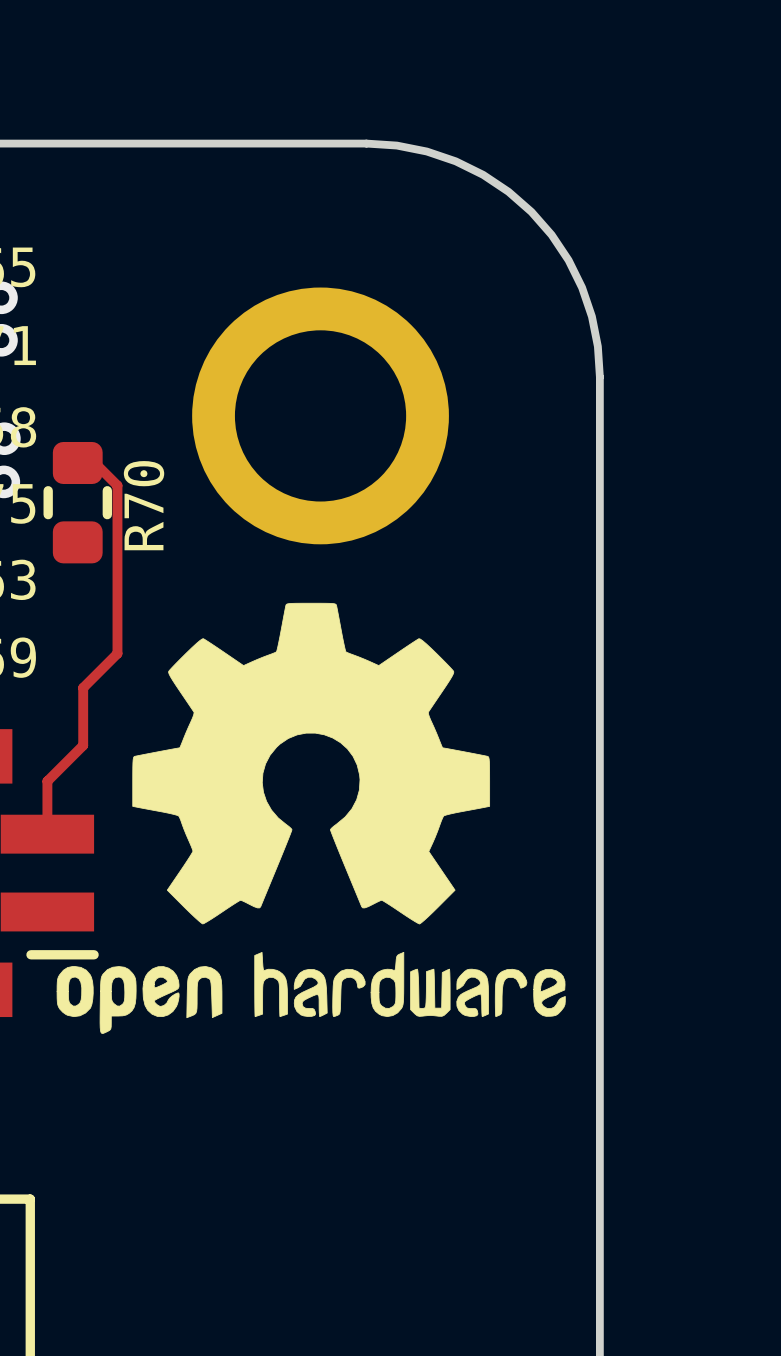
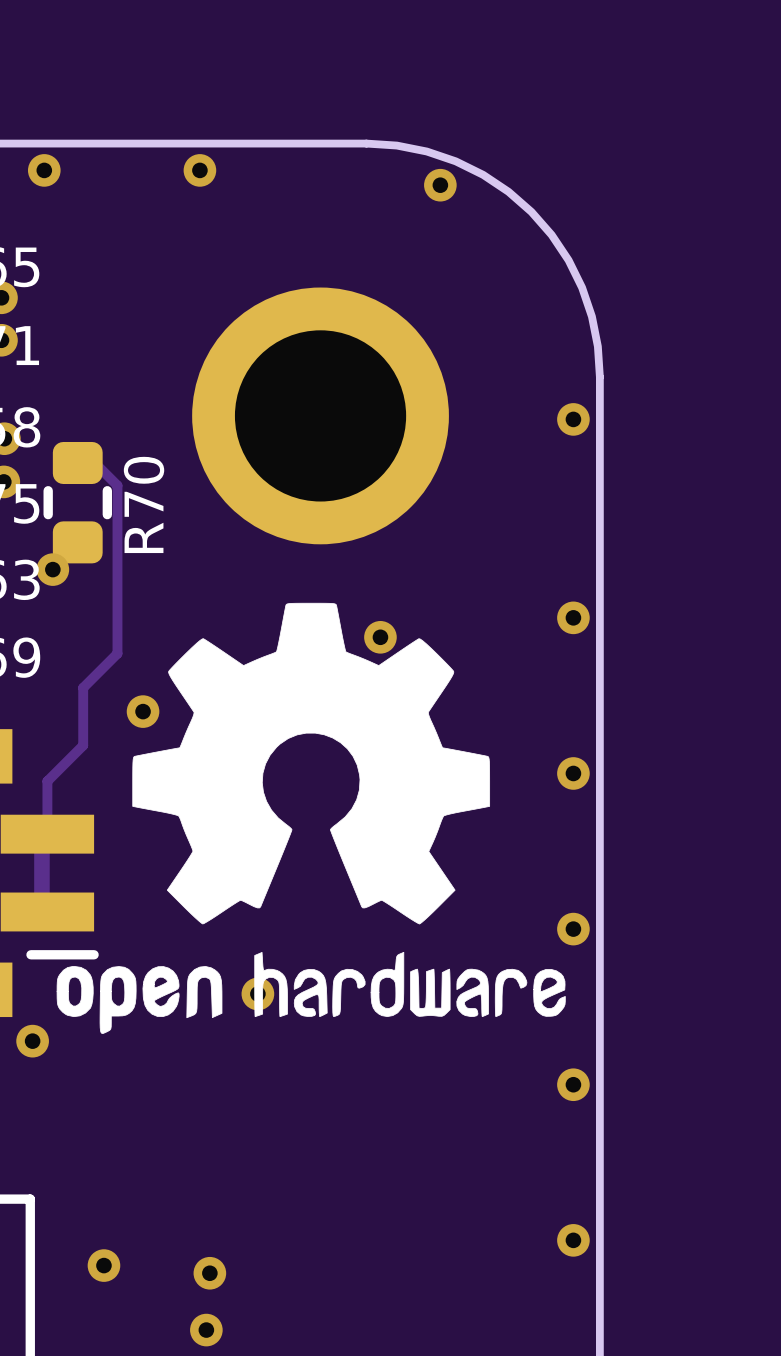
via: none -> (44, 170)
via: none -> (199, 170)
via: none -> (440, 185)
via: none -> (573, 419)
via: none -> (52, 569)
via: none -> (573, 617)
via: none -> (380, 637)
via: none -> (143, 711)
via: none -> (573, 773)
track: none -> (41, 834) (41, 912)
via: none -> (573, 929)
via: none -> (257, 993)
via: none -> (32, 1041)
via: none -> (573, 1084)
via: none -> (573, 1240)
via: none -> (103, 1265)
via: none -> (209, 1273)
via: none -> (206, 1330)

